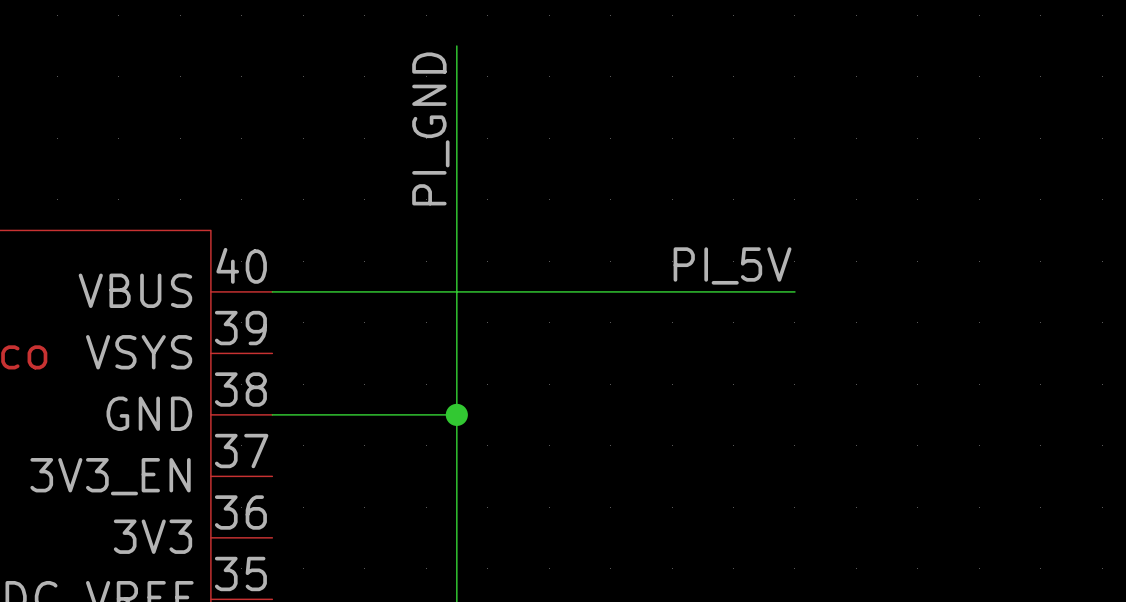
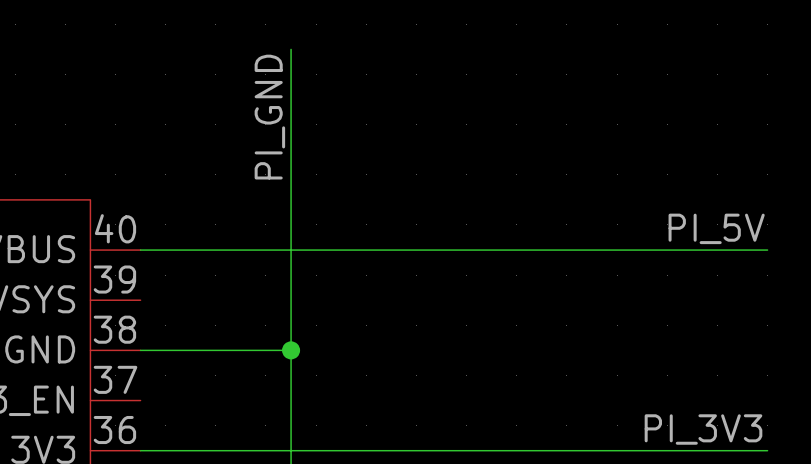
label position: PI_5V (732, 265) -> PI_5V (716, 228)
wire: none -> (566, 250) (767, 250)
label: none -> PI_3V3 (703, 429)
wire: none -> (140, 450) (767, 450)

